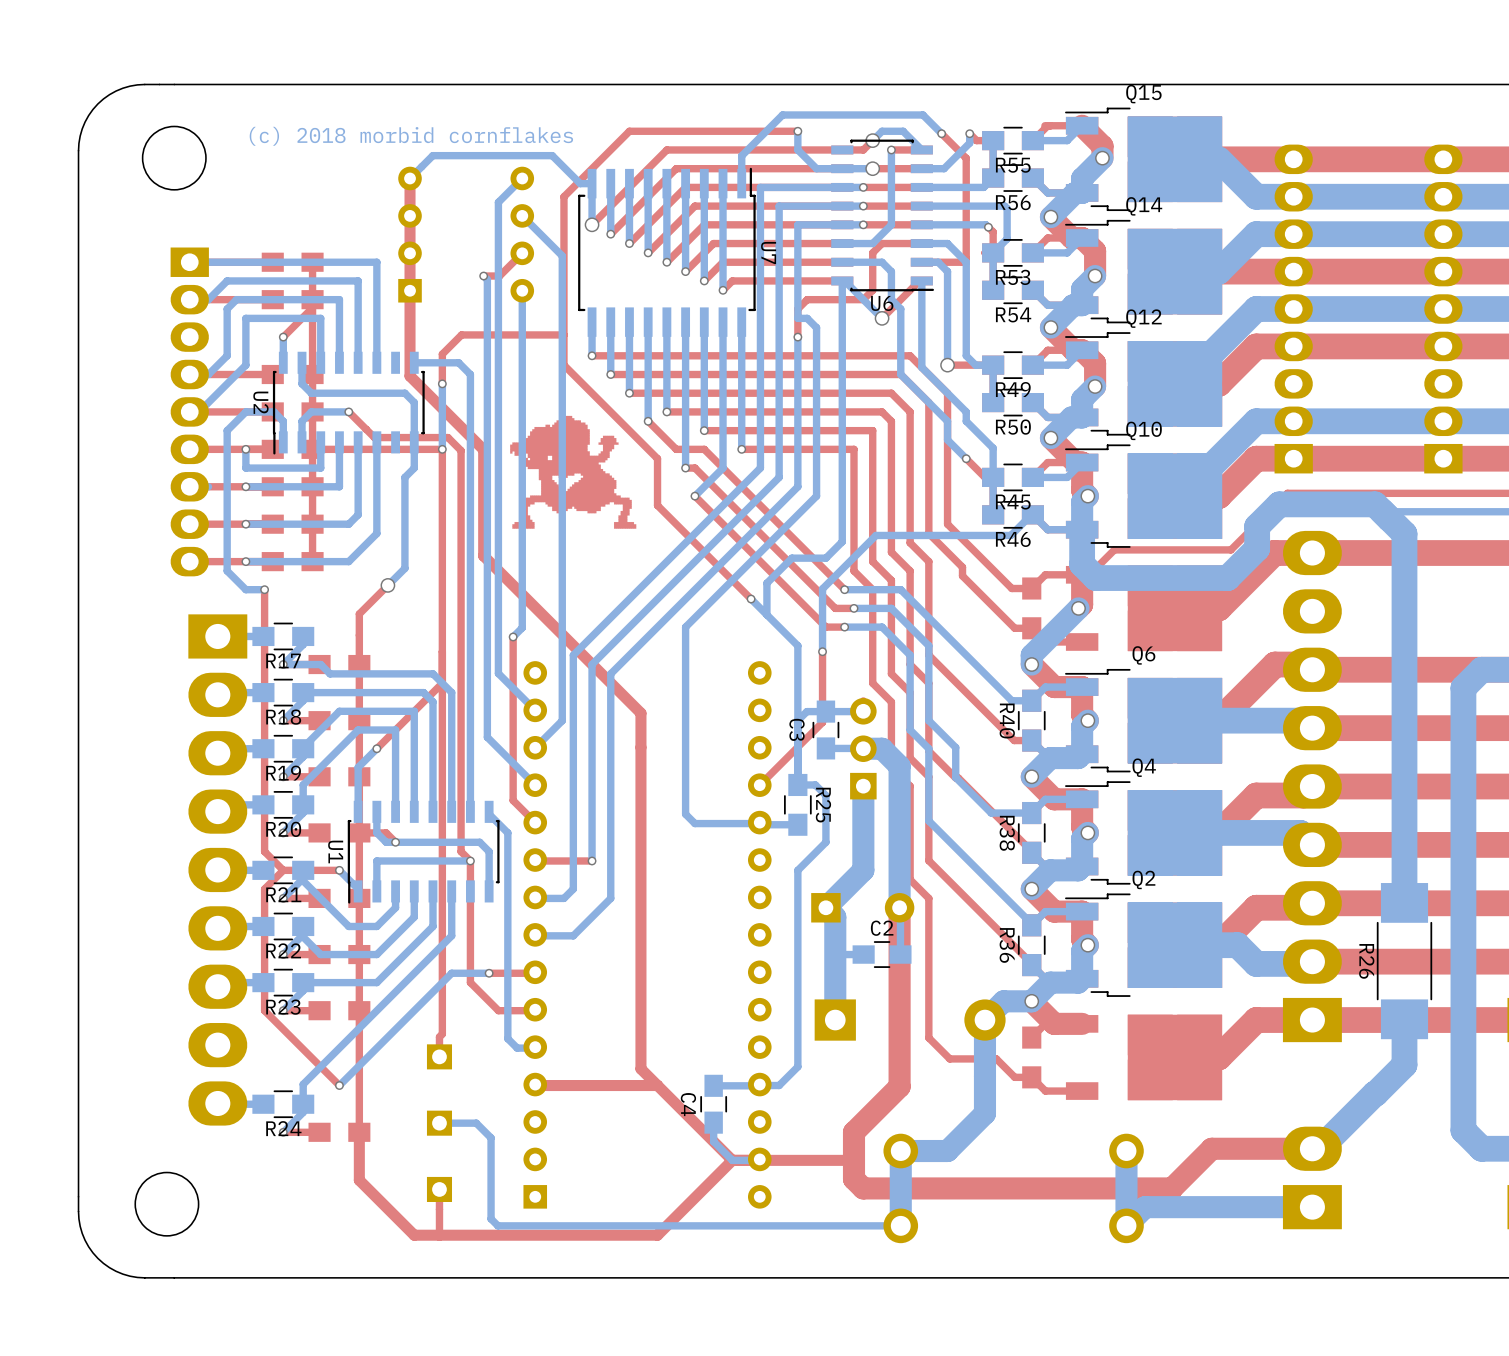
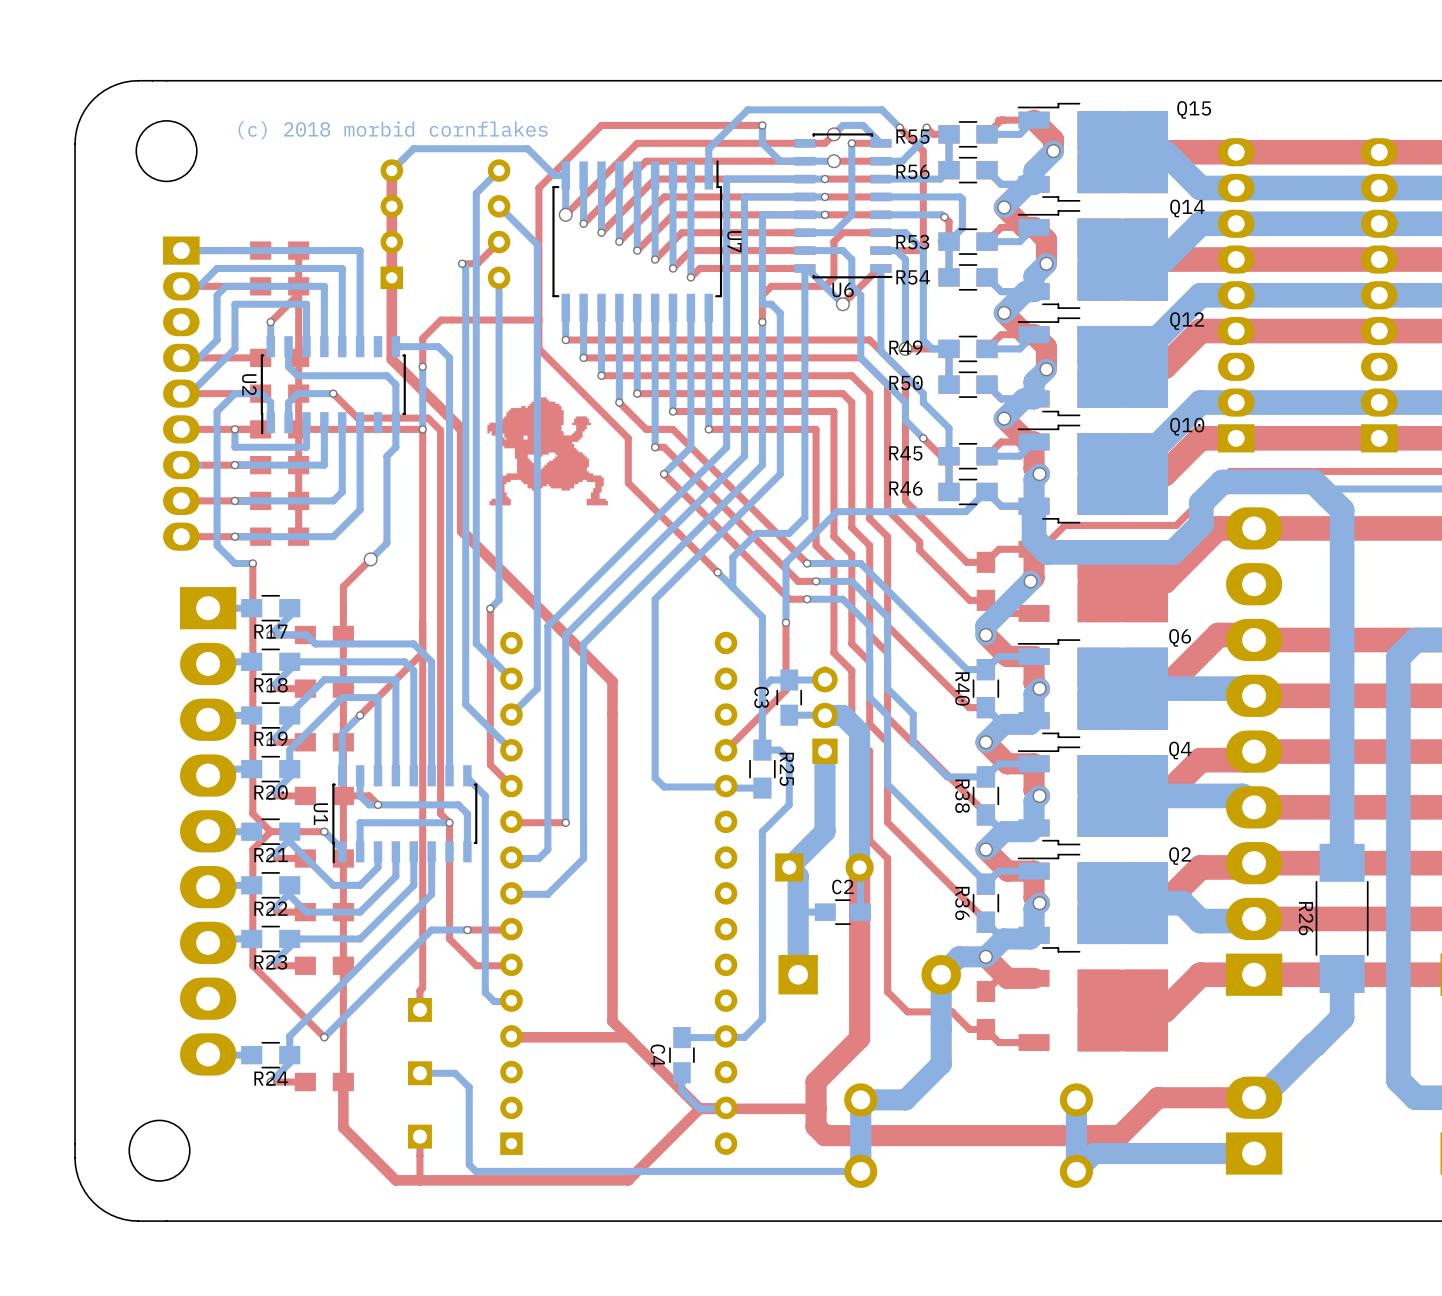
Q15 name position: Q15 (1143, 94) -> Q15 (1194, 109)
R55 name position: R55 (1013, 165) -> R55 (912, 136)
R56 name position: R56 (1013, 202) -> R56 (912, 171)
Q14 name position: Q14 (1144, 206) -> Q14 (1187, 208)
R53 name position: R53 (1013, 277) -> R53 (912, 242)
R54 name position: R54 (1013, 314) -> R54 (913, 277)
Q12 name position: Q12 (1143, 318) -> Q12 (1187, 321)
R49 name position: R49 (1013, 389) -> R49 (905, 347)
R50 name position: R50 (1013, 427) -> R50 (906, 382)
Q10 name position: Q10 (1144, 430) -> Q10 (1187, 426)
R45 name position: R45 (1013, 502) -> R45 (905, 453)
R46 name position: R46 (1013, 539) -> R46 (905, 488)
Q6 name position: Q6 (1143, 655) -> Q6 (1180, 637)
Q4 name position: Q4 (1144, 767) -> Q4 (1180, 750)
Q2 name position: Q2 (1143, 879) -> Q2 (1180, 856)

